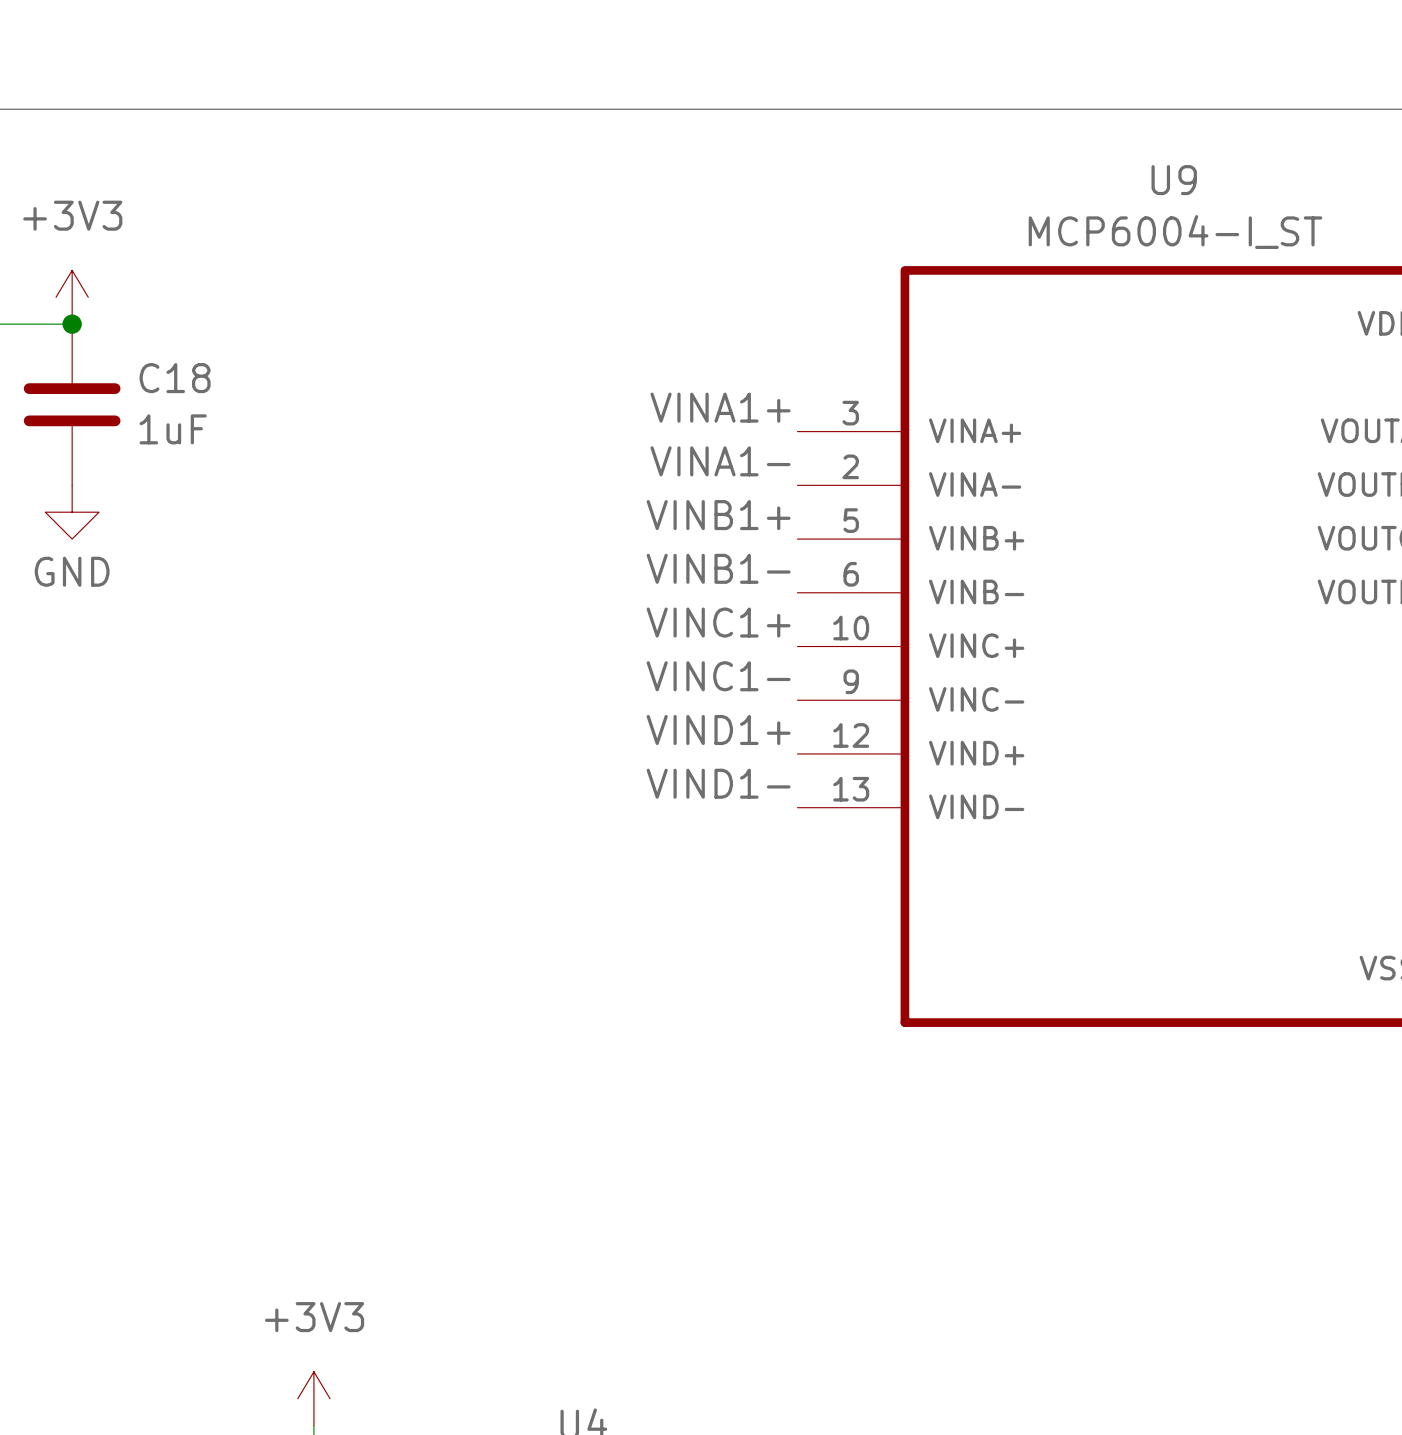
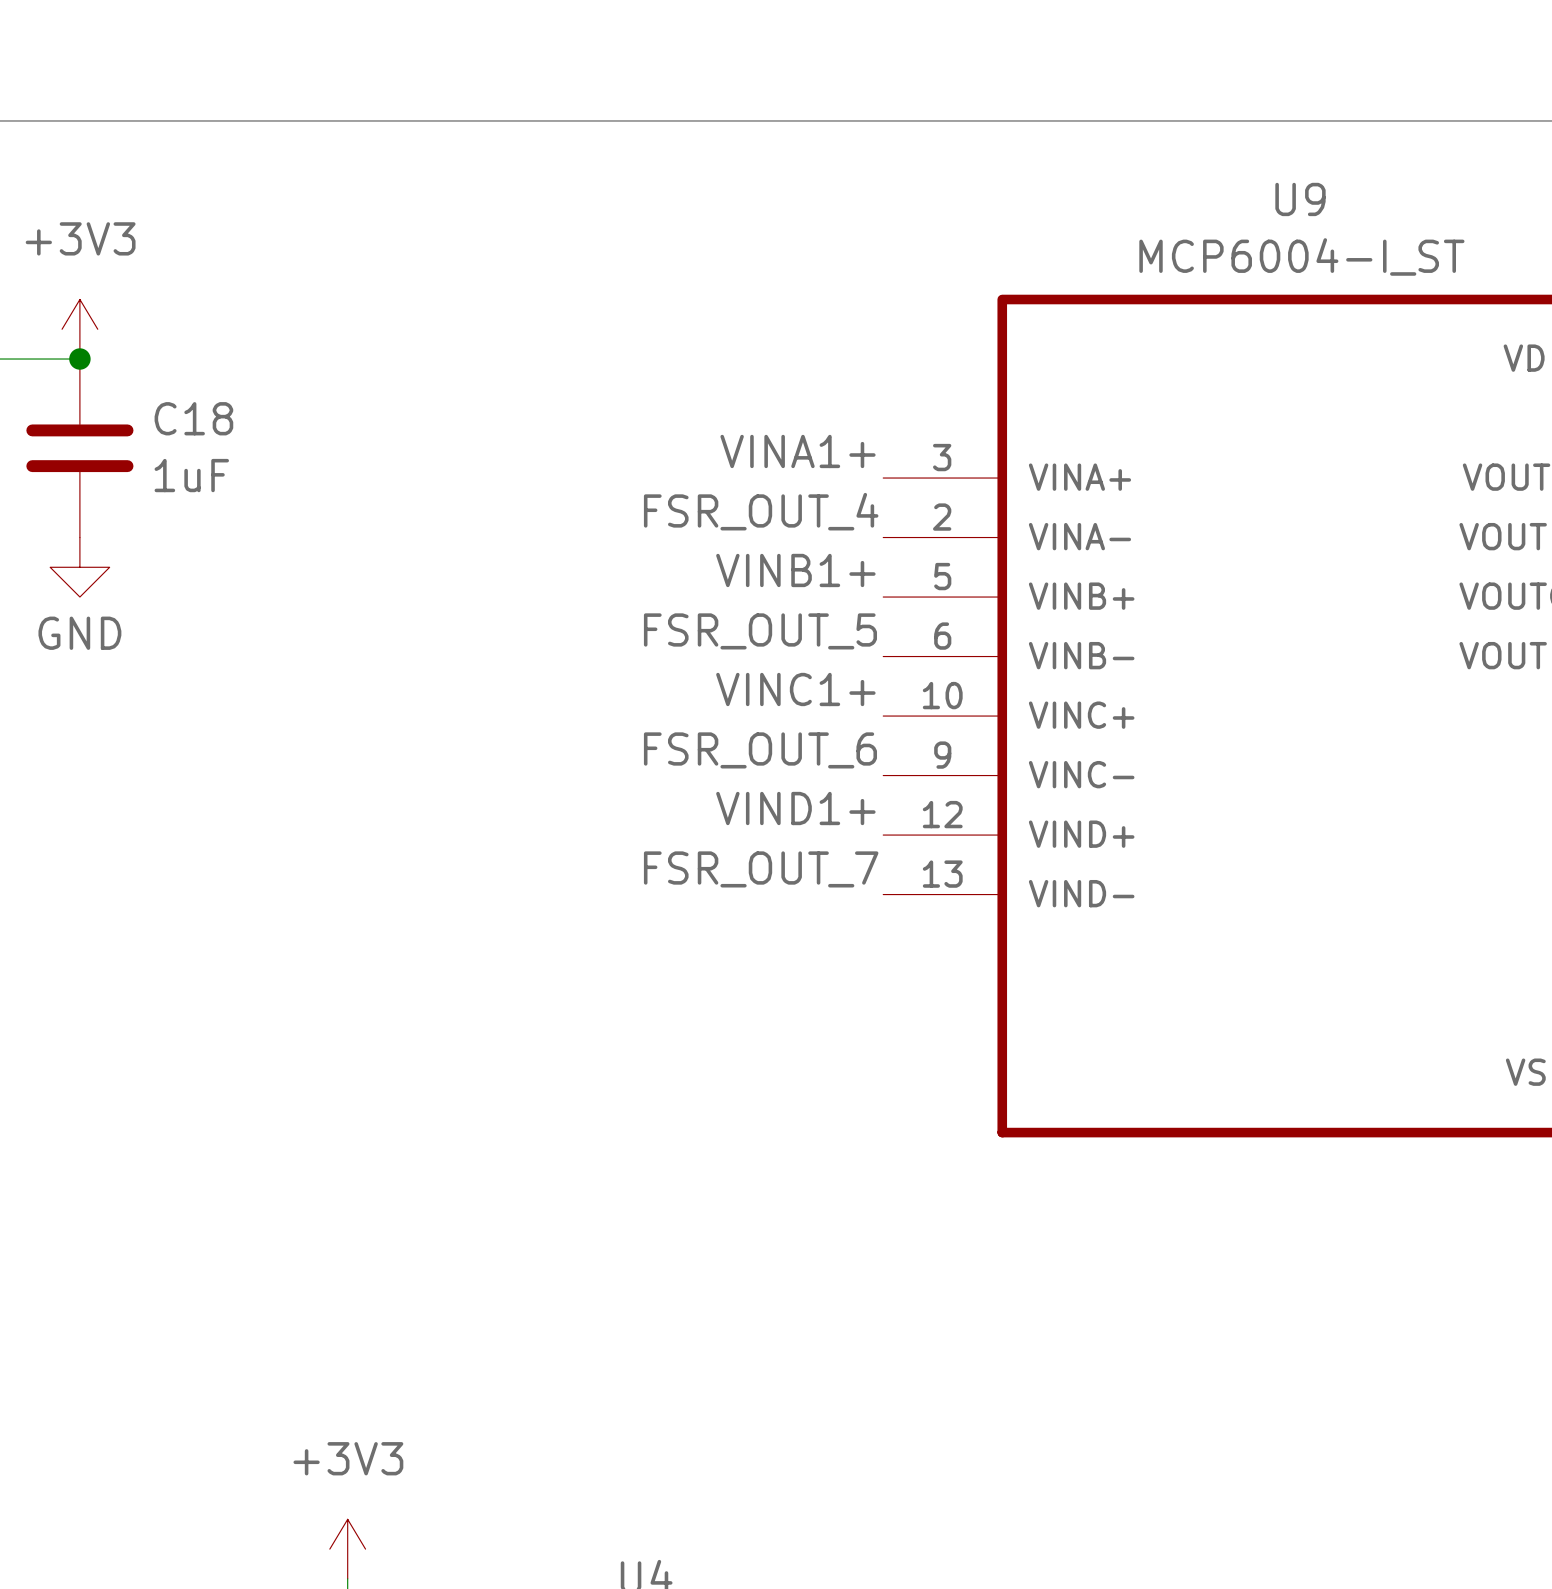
label: VINA1- (720, 461) -> FSR_OUT_4 (761, 511)
label: VINB1- (718, 568) -> FSR_OUT_5 (760, 631)
label: VINC1- (718, 676) -> FSR_OUT_6 (760, 750)
label: VIND1- (718, 783) -> FSR_OUT_7 (761, 869)

